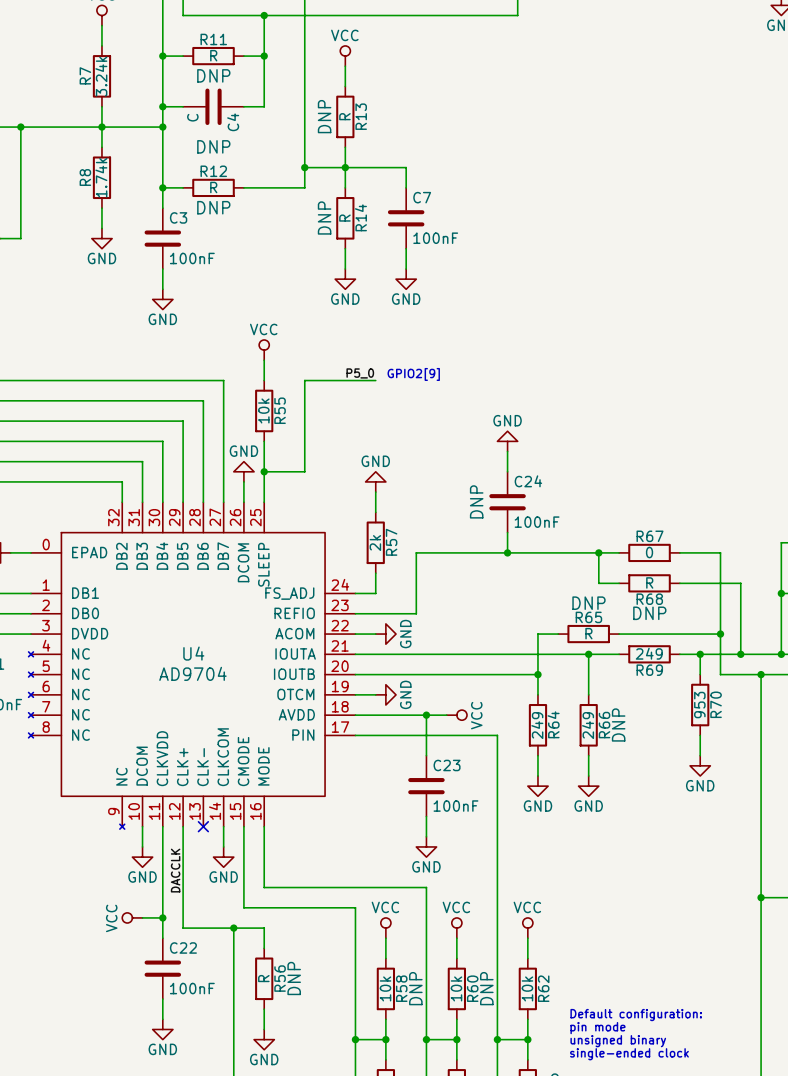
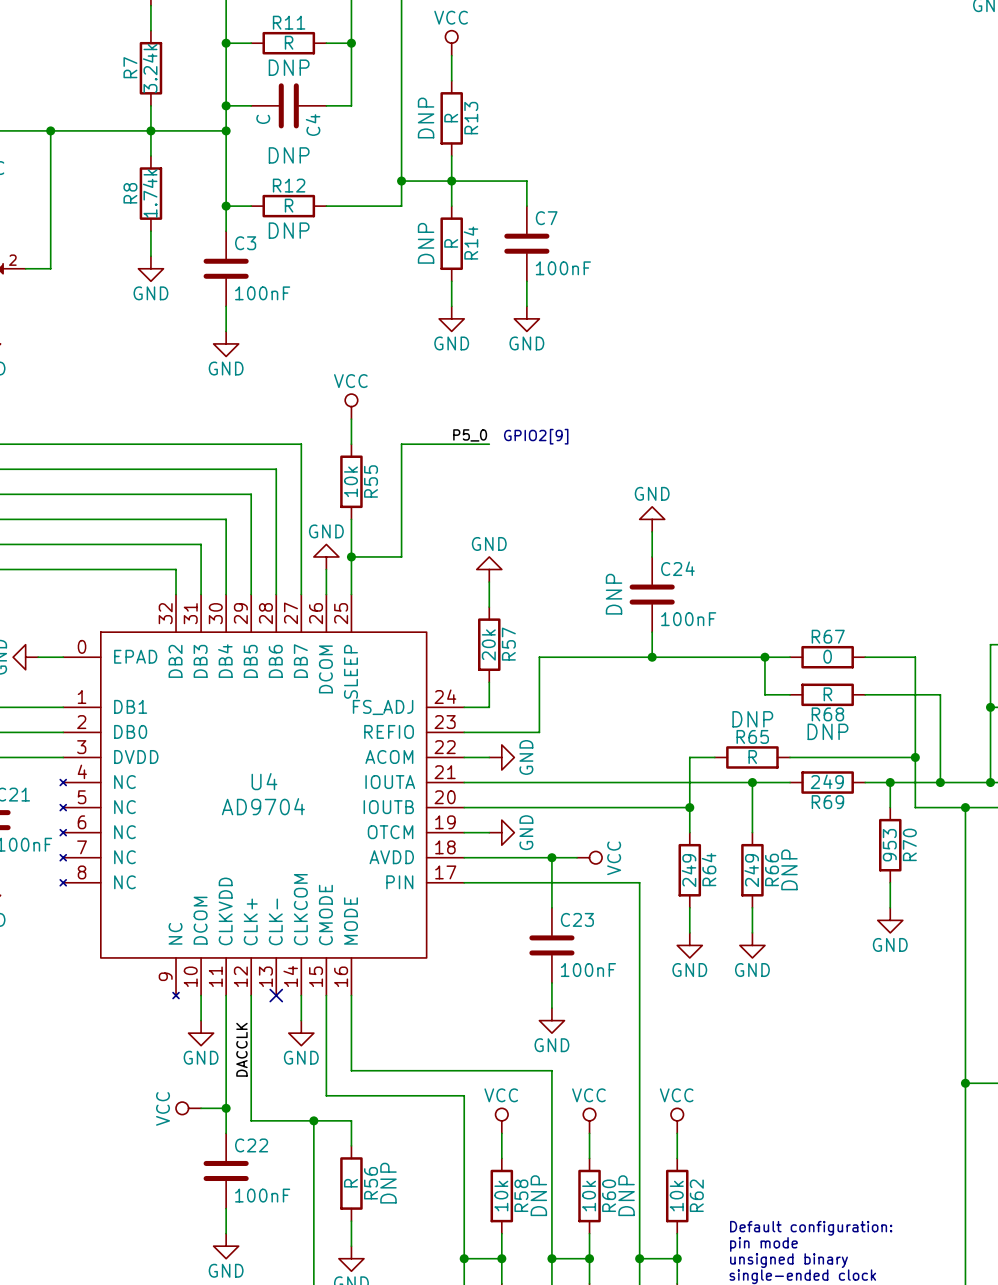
R57 value: 2k (375, 543) -> 20k (488, 644)

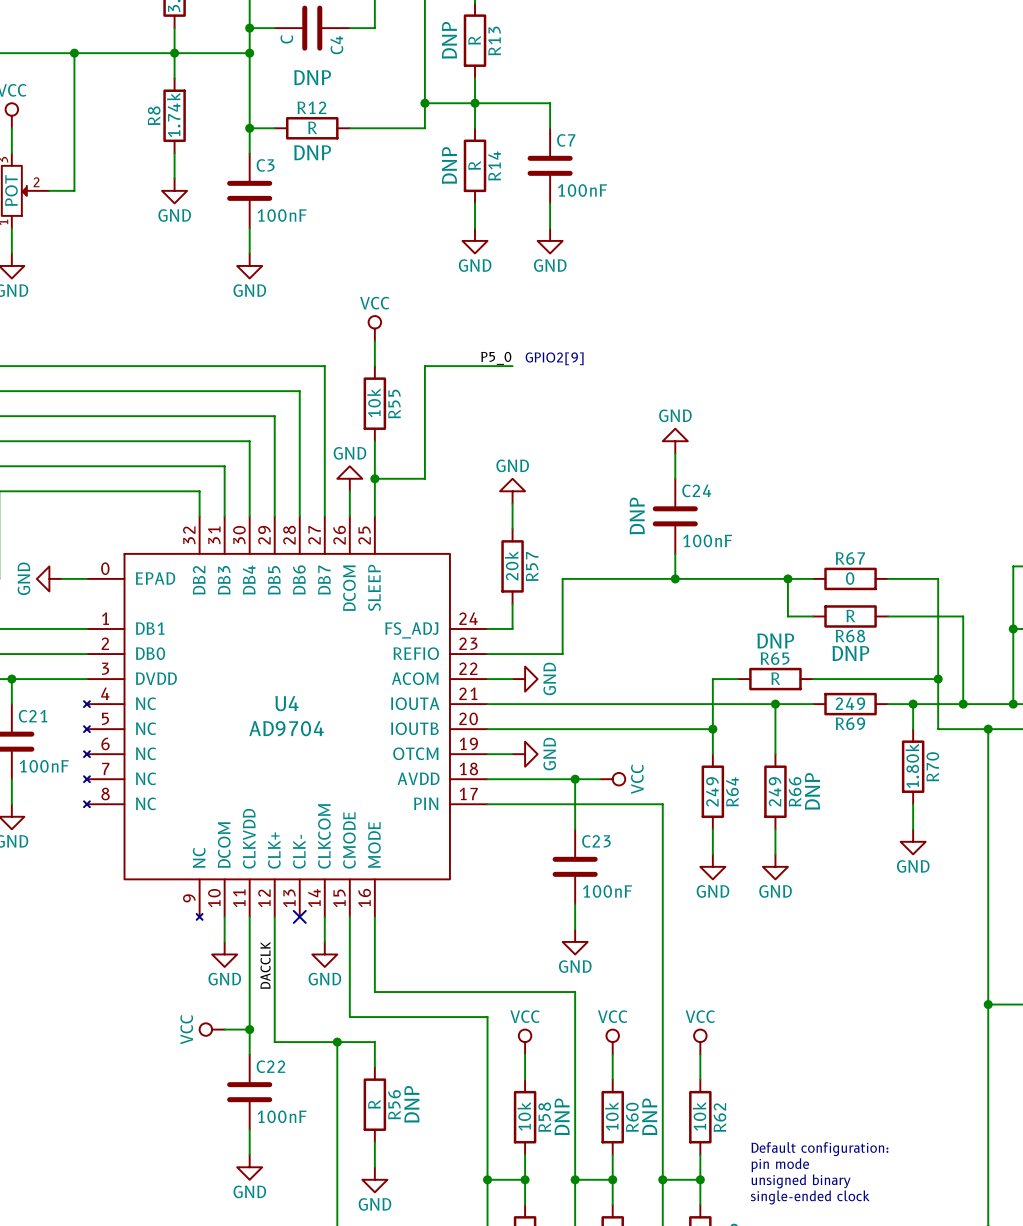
R70 value: 953 (889, 845) -> 1.80k (912, 765)

